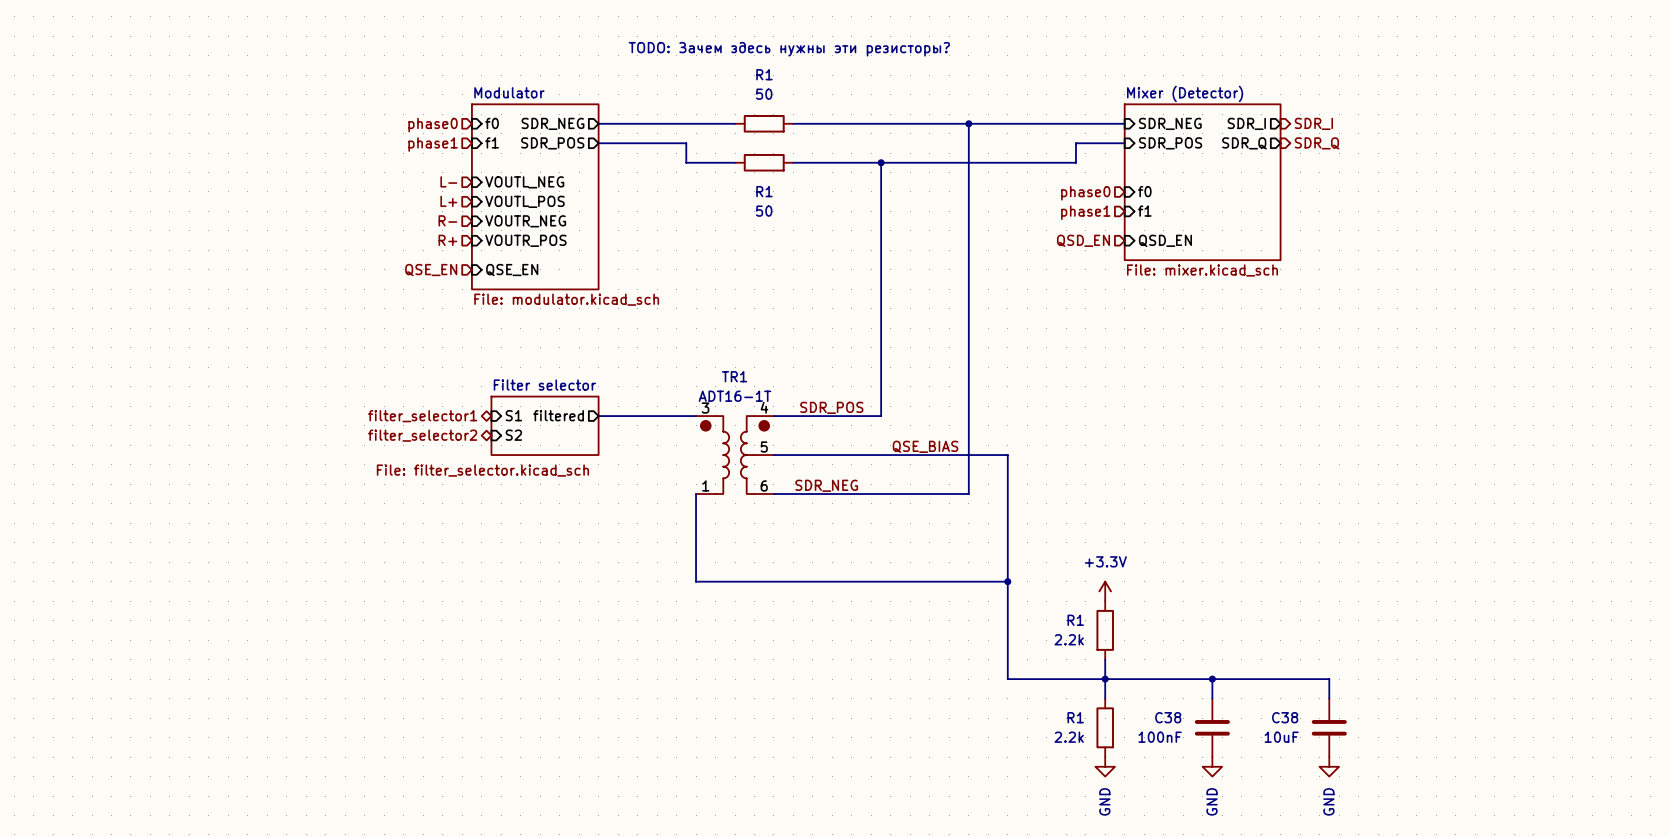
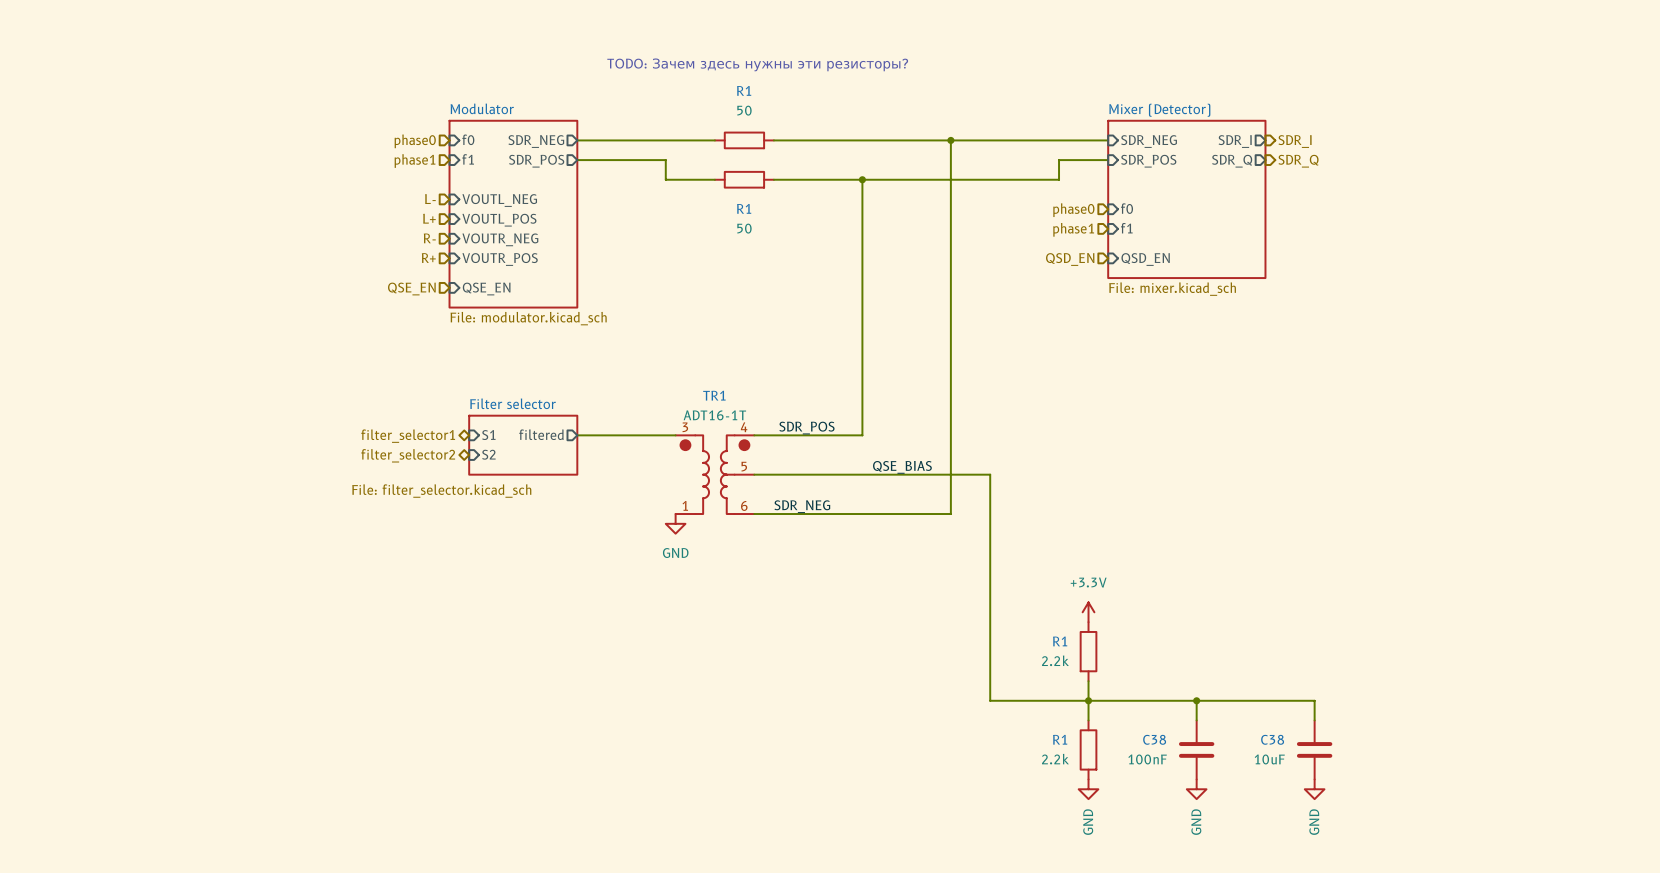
wire: (696, 494) (696, 581) (1007, 581) -> none
power symbol: none -> GND (675, 523)
junction: (1007, 581) -> none

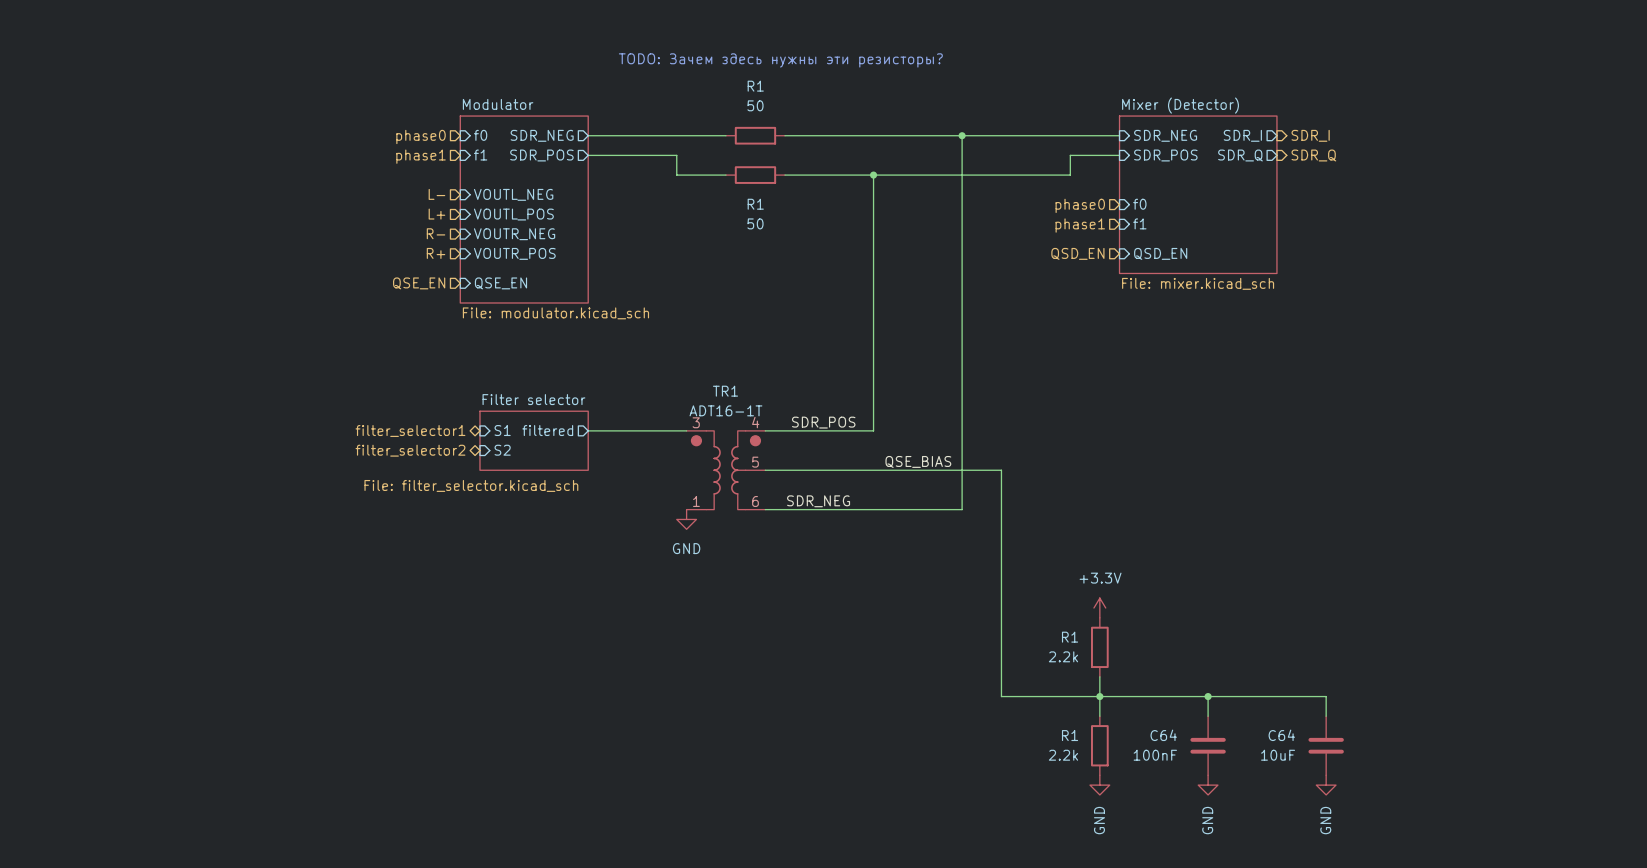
C38 name: C38 (1154, 739) -> C64 (1163, 735)
C38 name: C38 (1272, 739) -> C64 (1281, 735)

